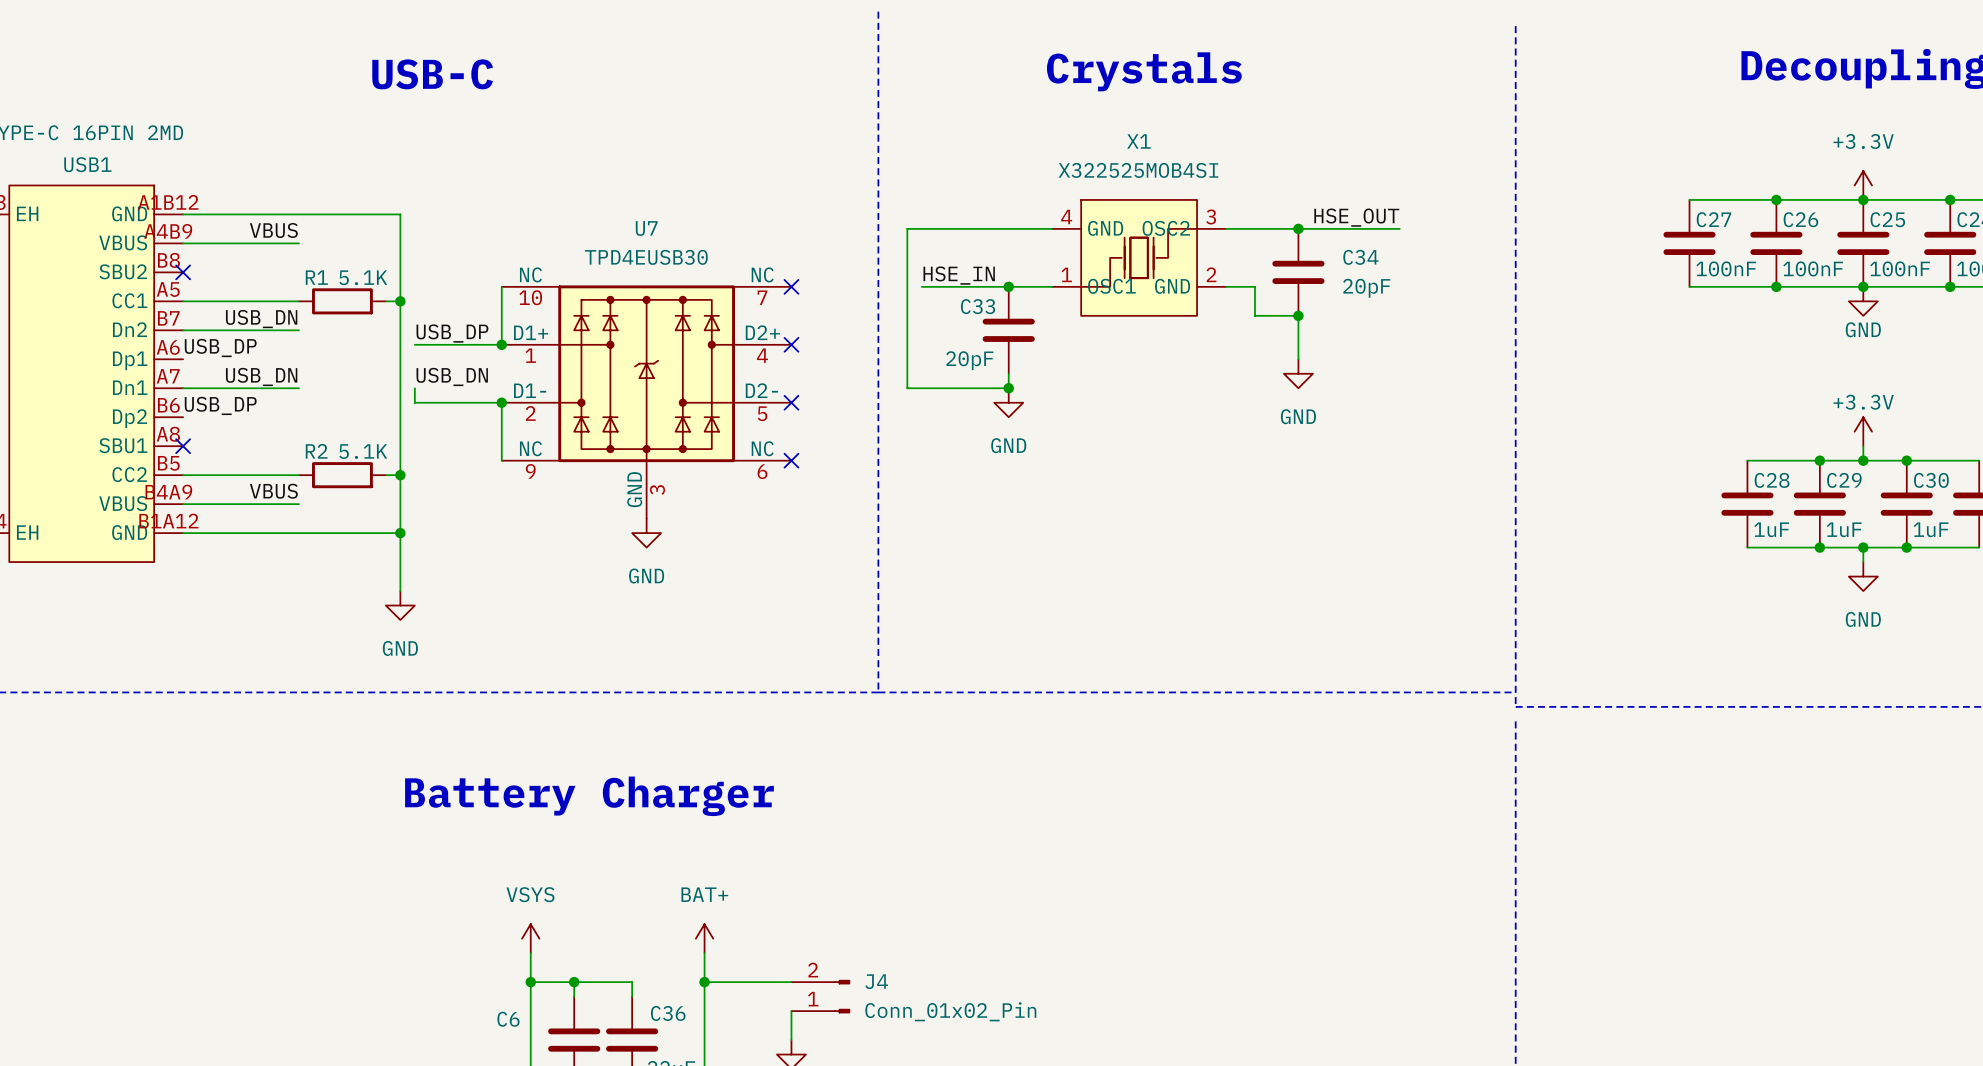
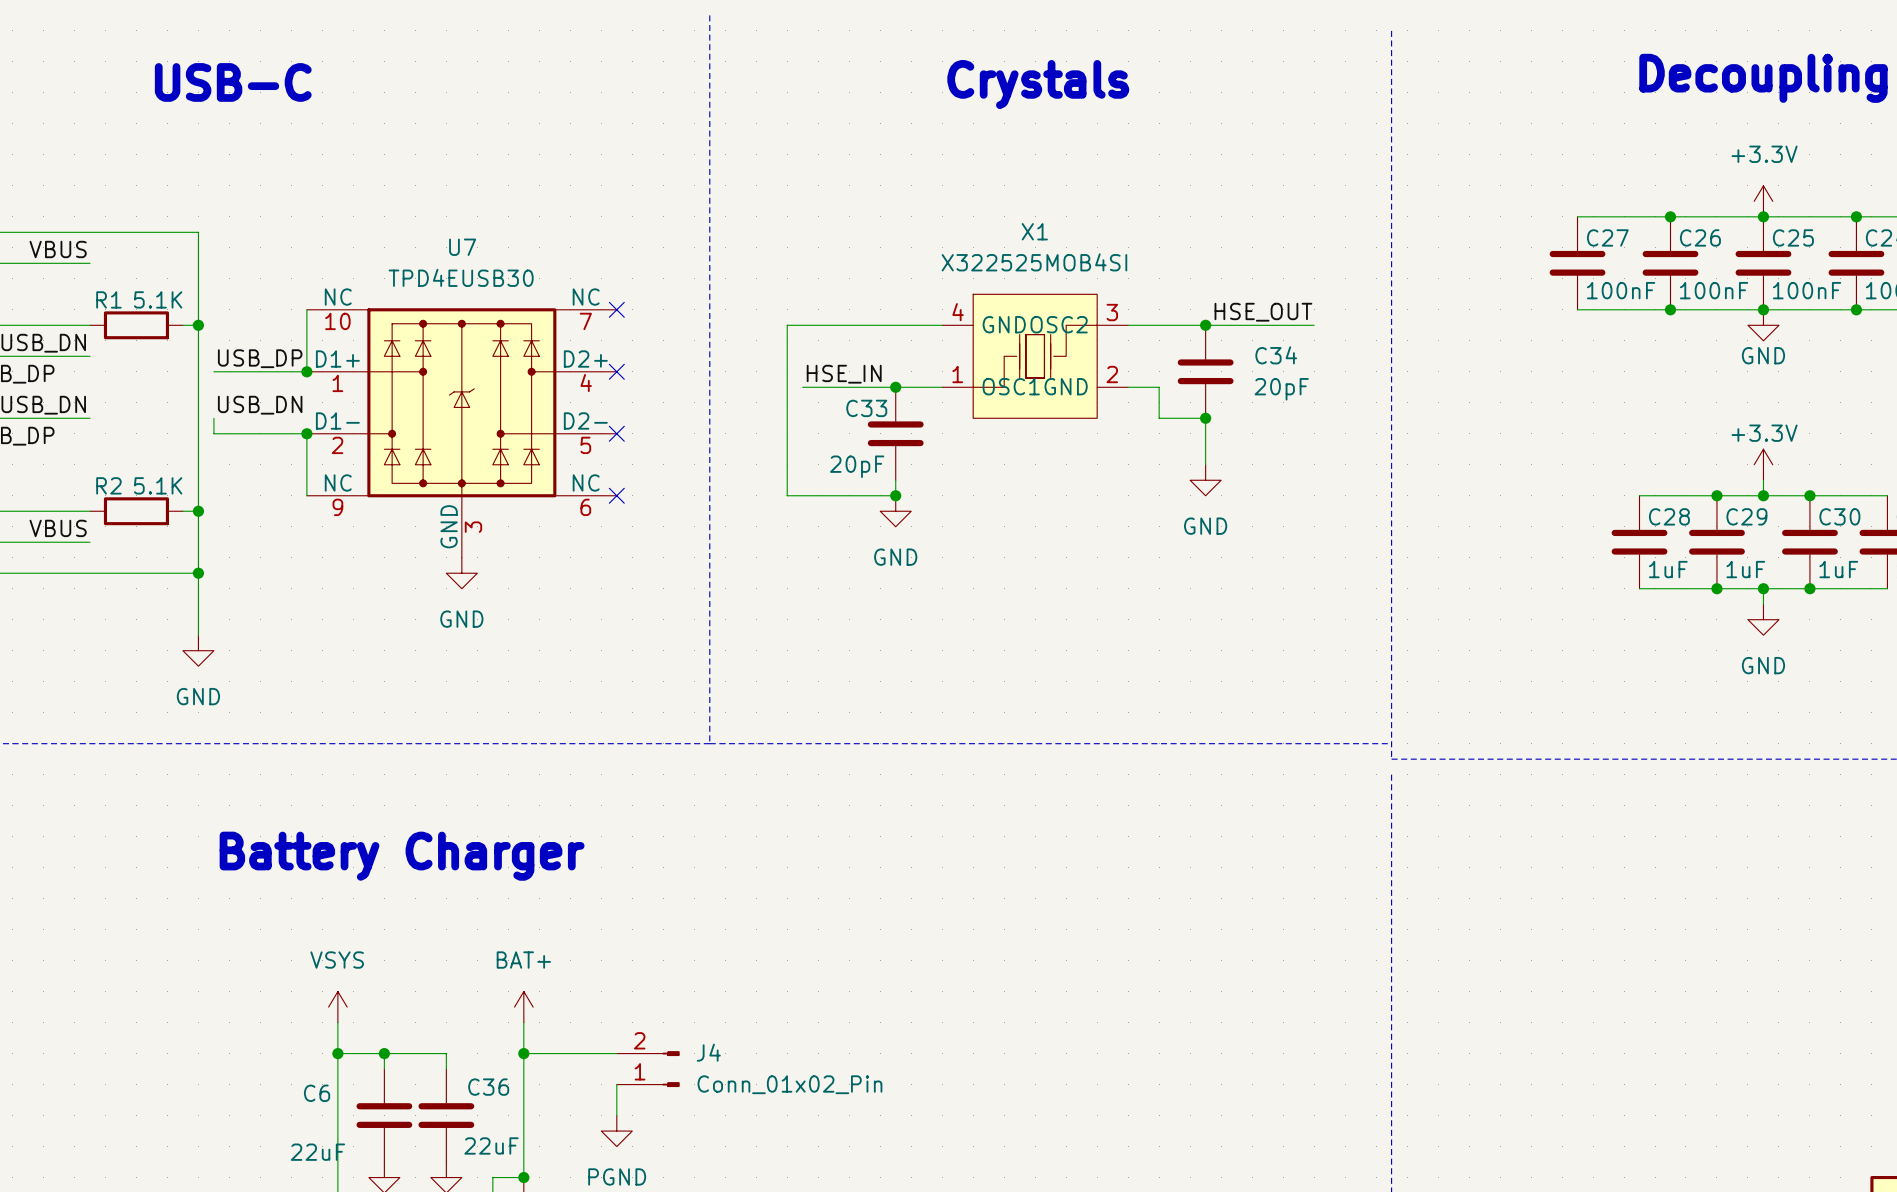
text position: Crystals (1144, 71) -> Crystals (1038, 84)
label position: HSE_OUT (1356, 217) -> HSE_OUT (1263, 312)
wire: (1052, 228) (907, 228) (907, 388) (1008, 388) (1008, 373) -> (942, 325) (787, 325) (787, 495) (895, 495) (895, 480)
wire: (1226, 228) (1399, 228) -> (1128, 325) (1314, 325)
junction: (1298, 228) -> none
X1 position: (1139, 257) -> (1035, 356)
C34 position: (1298, 272) -> (1205, 371)
label position: HSE_IN (959, 275) -> HSE_IN (844, 374)
wire: (921, 286) (1052, 286) -> (802, 387) (942, 387)
junction: (1008, 286) -> none
wire: (1226, 286) (1254, 286) (1254, 315) (1298, 315) (1298, 359) -> (1128, 387) (1159, 387) (1159, 418) (1205, 418) (1205, 464)
junction: none -> (1205, 325)
junction: (1298, 315) -> none
C33 position: (1008, 330) -> (895, 433)
junction: none -> (895, 387)
power symbol position: GND (1298, 373) -> GND (1205, 480)
junction: (1008, 388) -> none
junction: none -> (1205, 418)
power symbol position: GND (1008, 402) -> GND (895, 511)
junction: none -> (895, 495)

